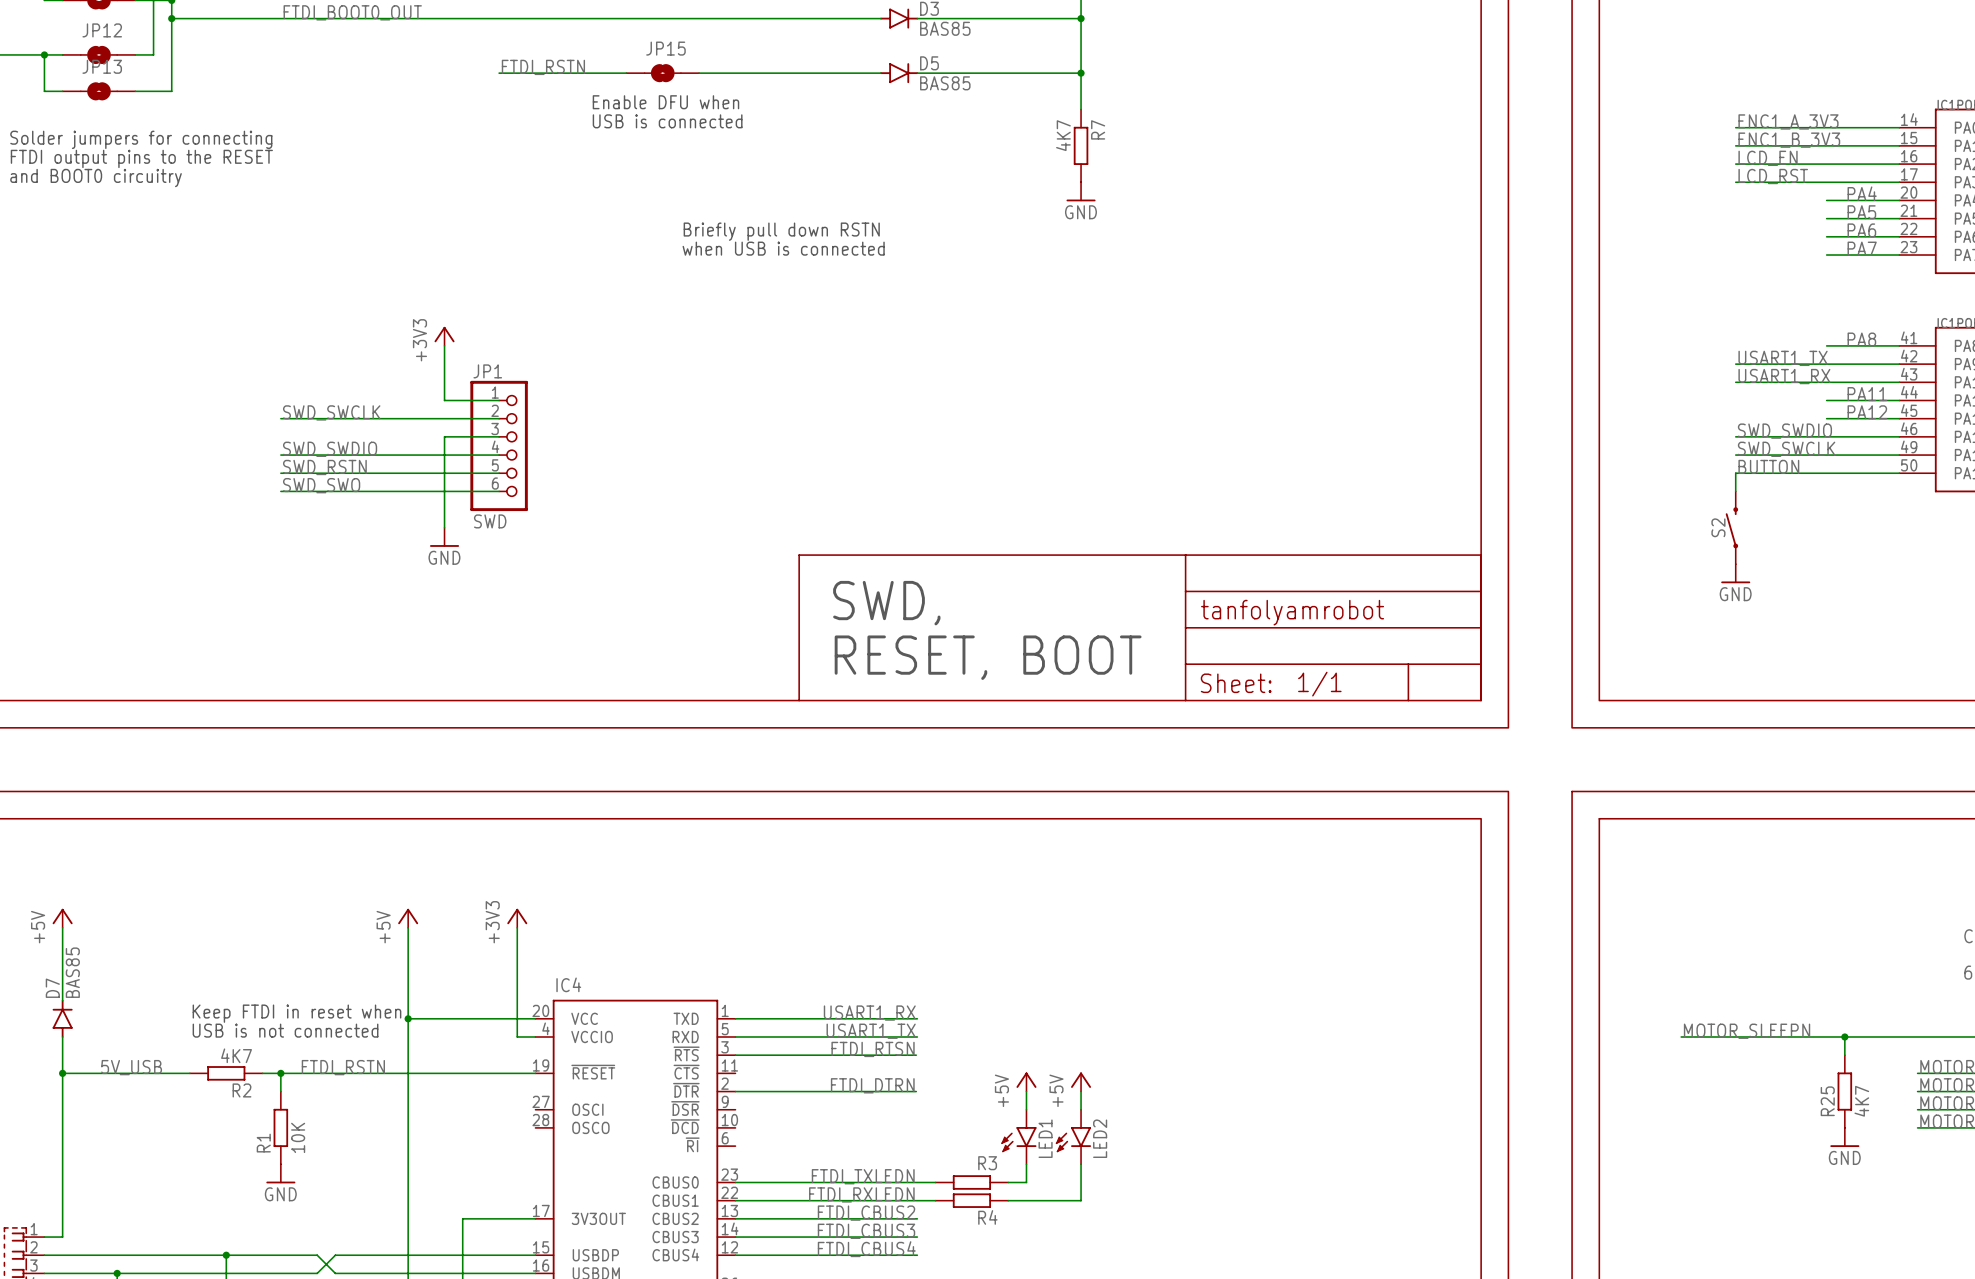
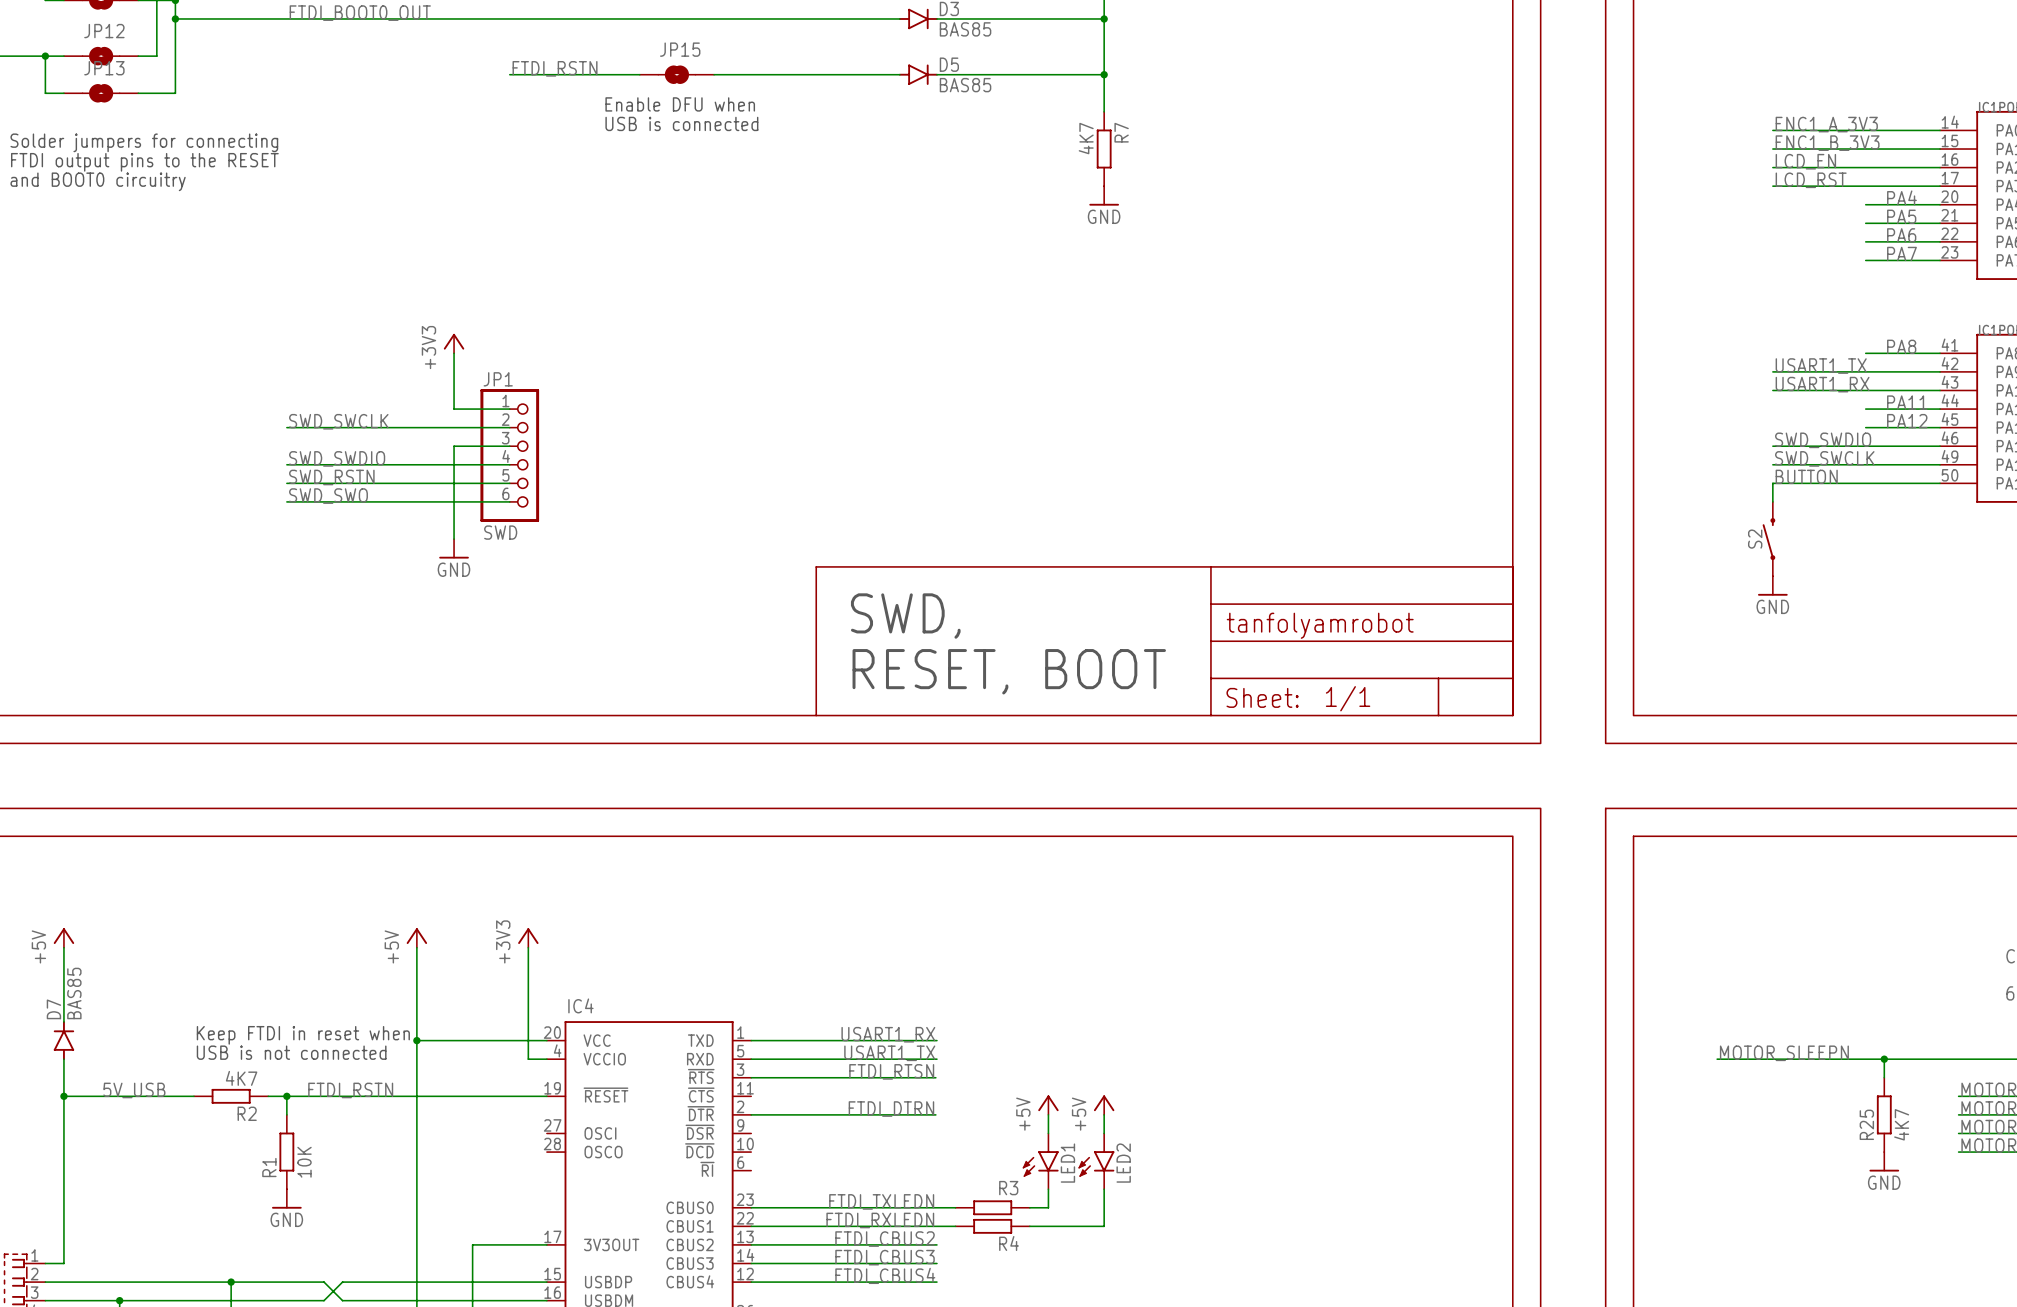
text: Briefly pull down RSTN (781, 231) -> none
text: when USB is connected (783, 248) -> none

